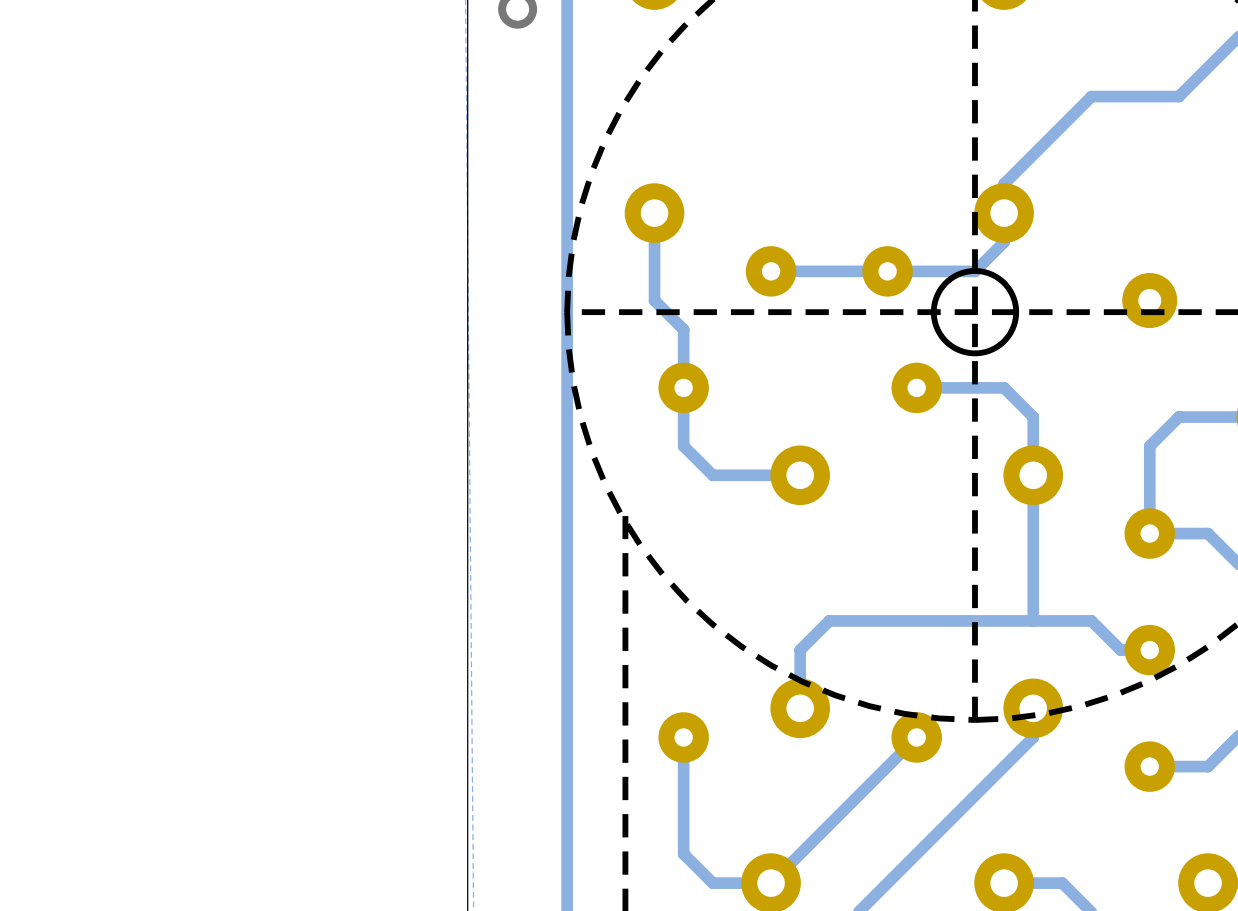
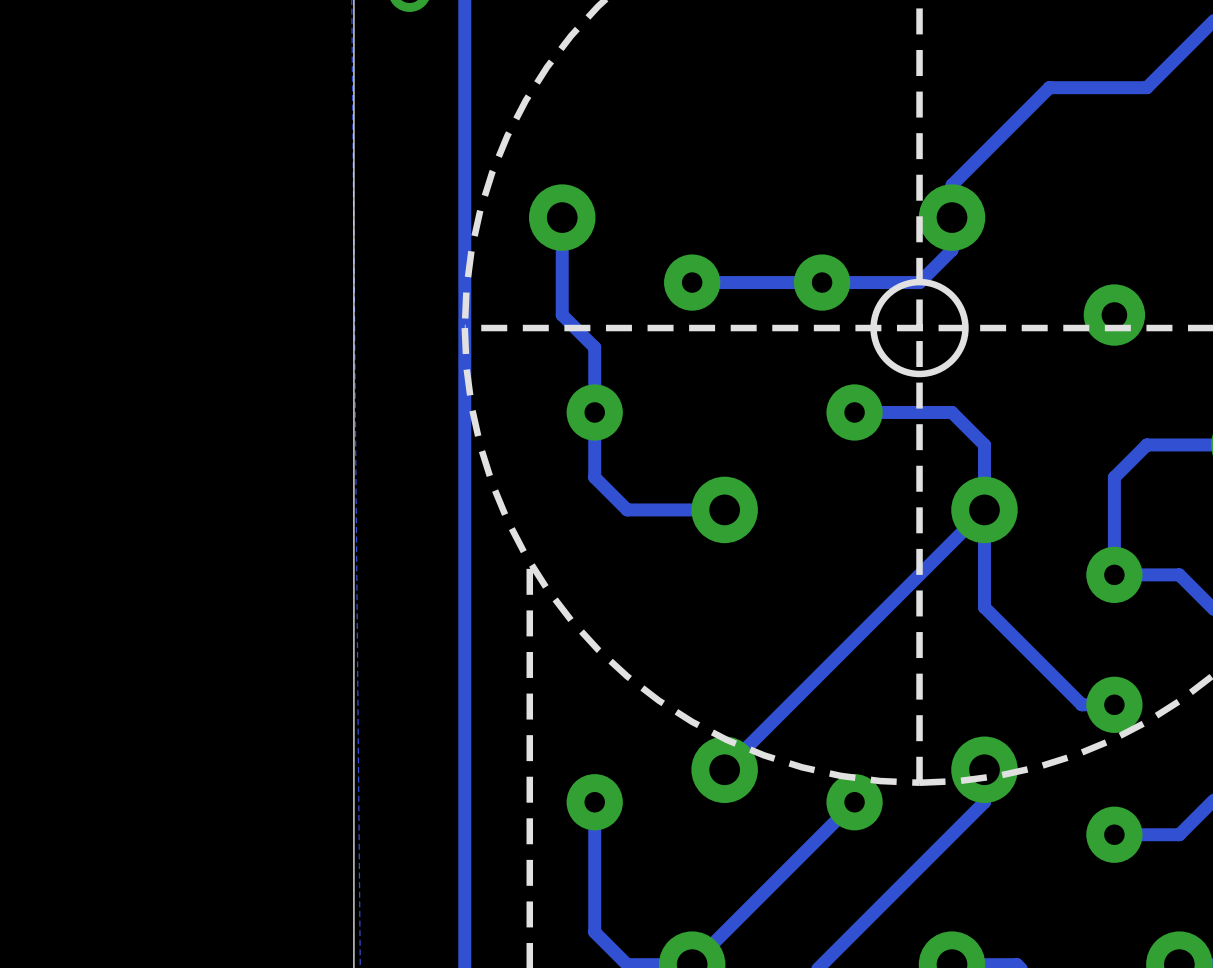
track: (1033, 562) (1033, 620) -> (984, 607) (1049, 672)
track: (1091, 620) (829, 620) (800, 650) (800, 708) -> (984, 509) (724, 769)

